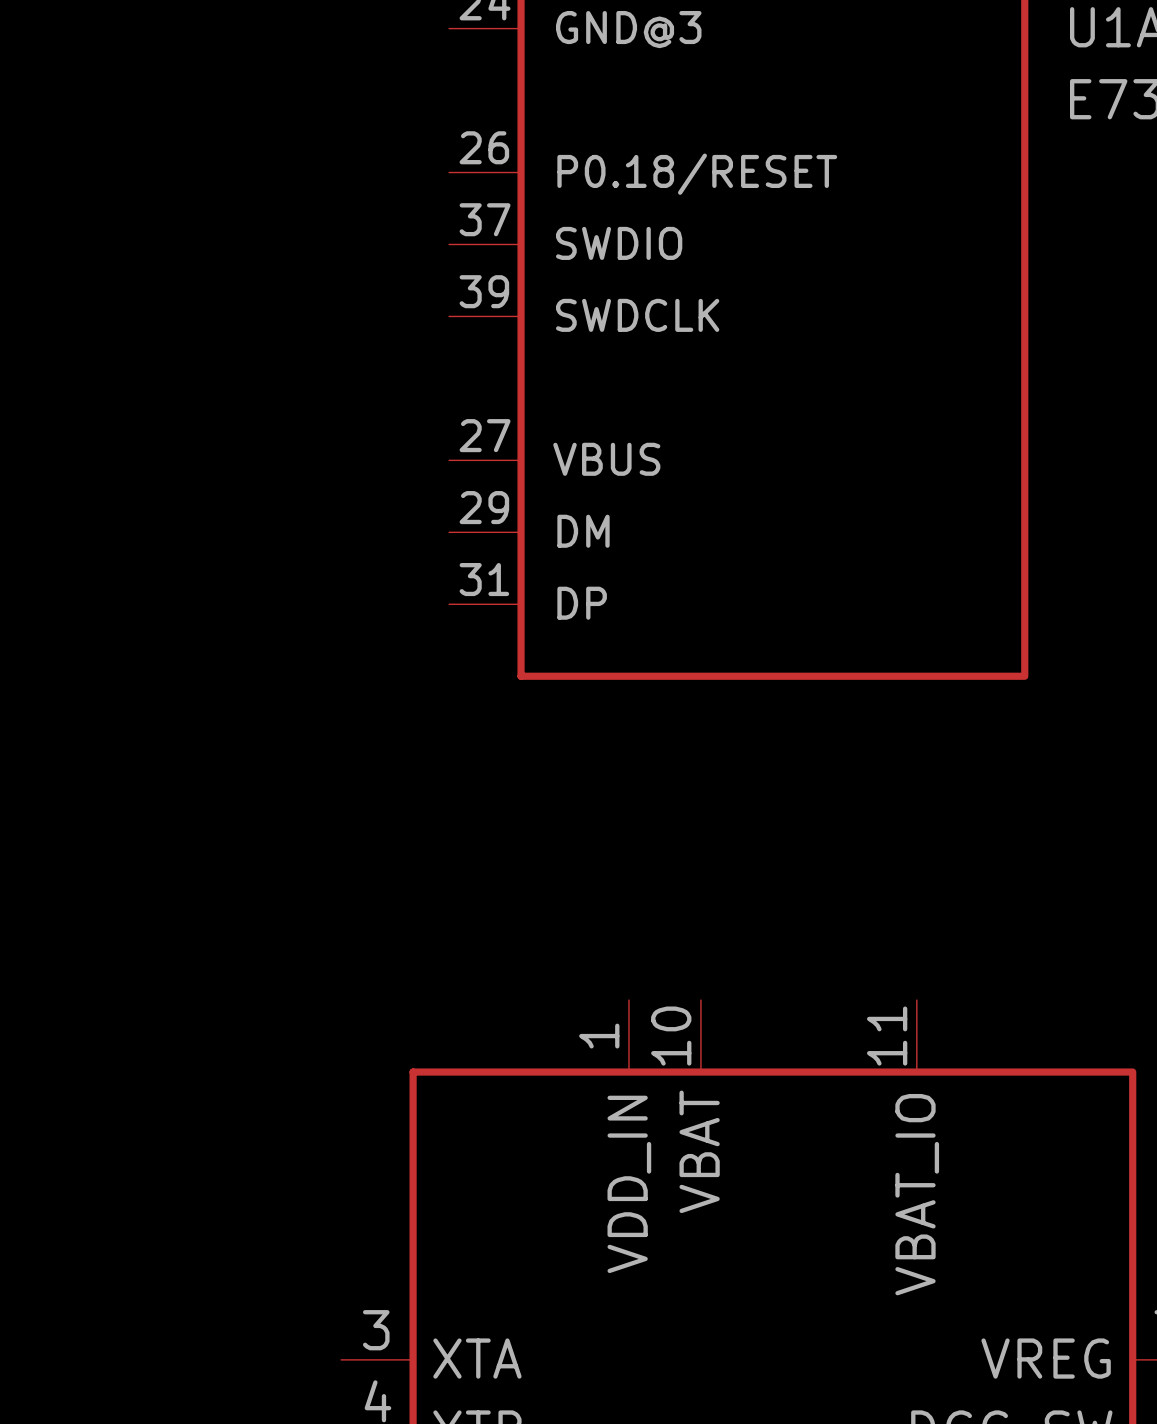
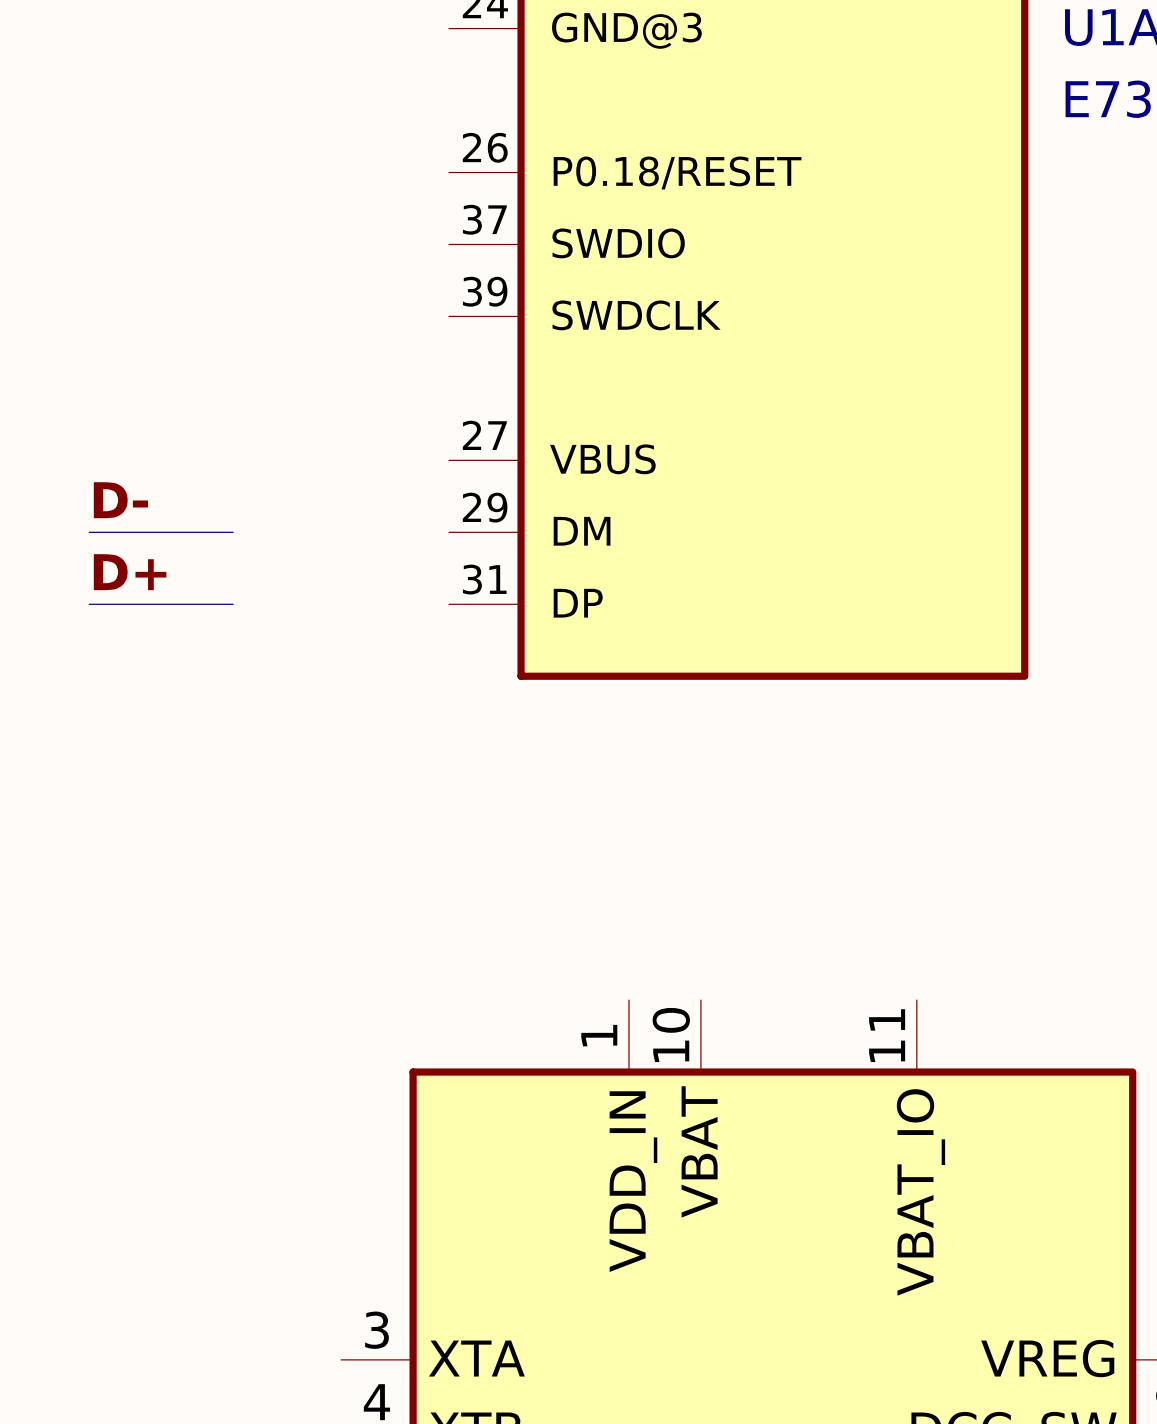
label: none -> D- (120, 500)
wire: none -> (89, 532) (233, 532)
label: none -> D+ (130, 572)
wire: none -> (89, 604) (233, 604)

